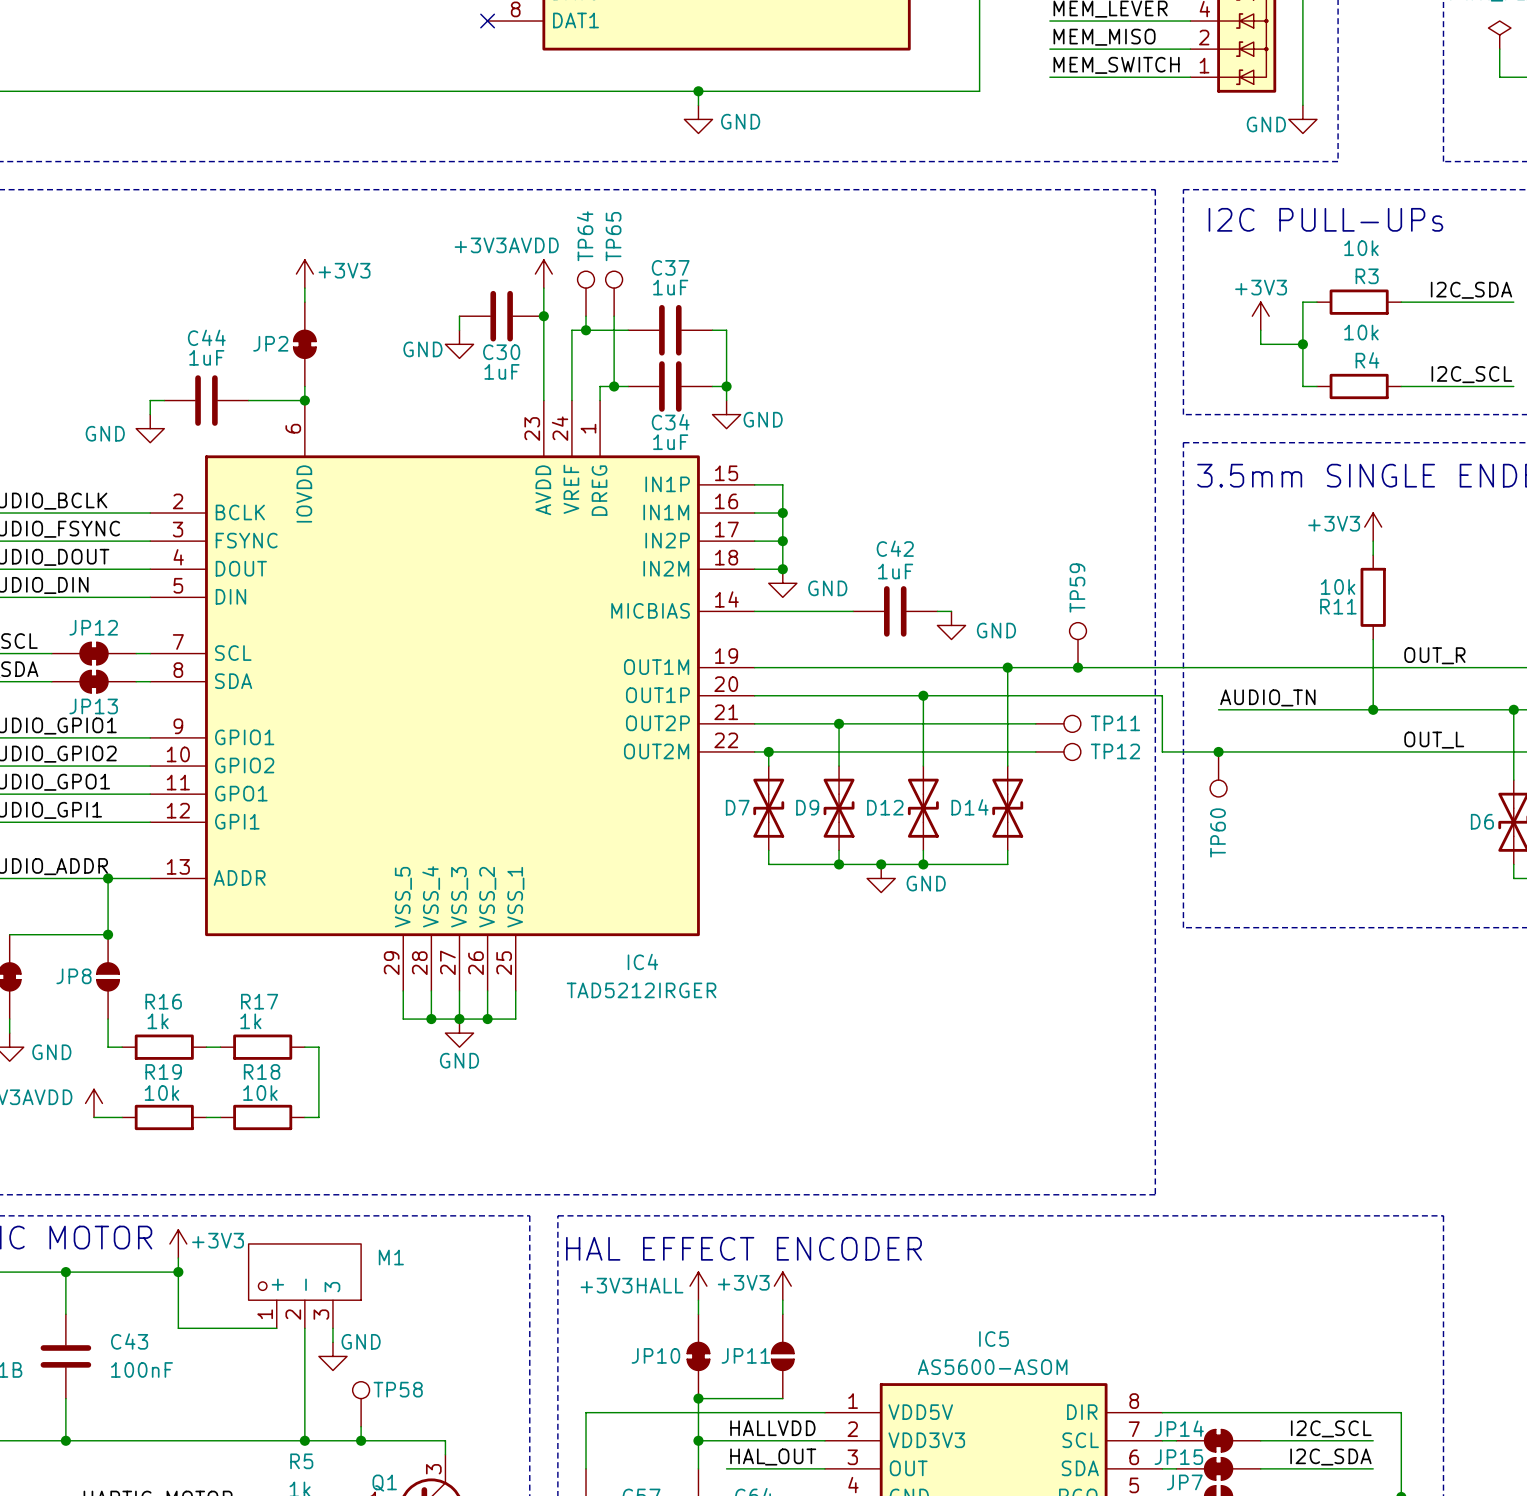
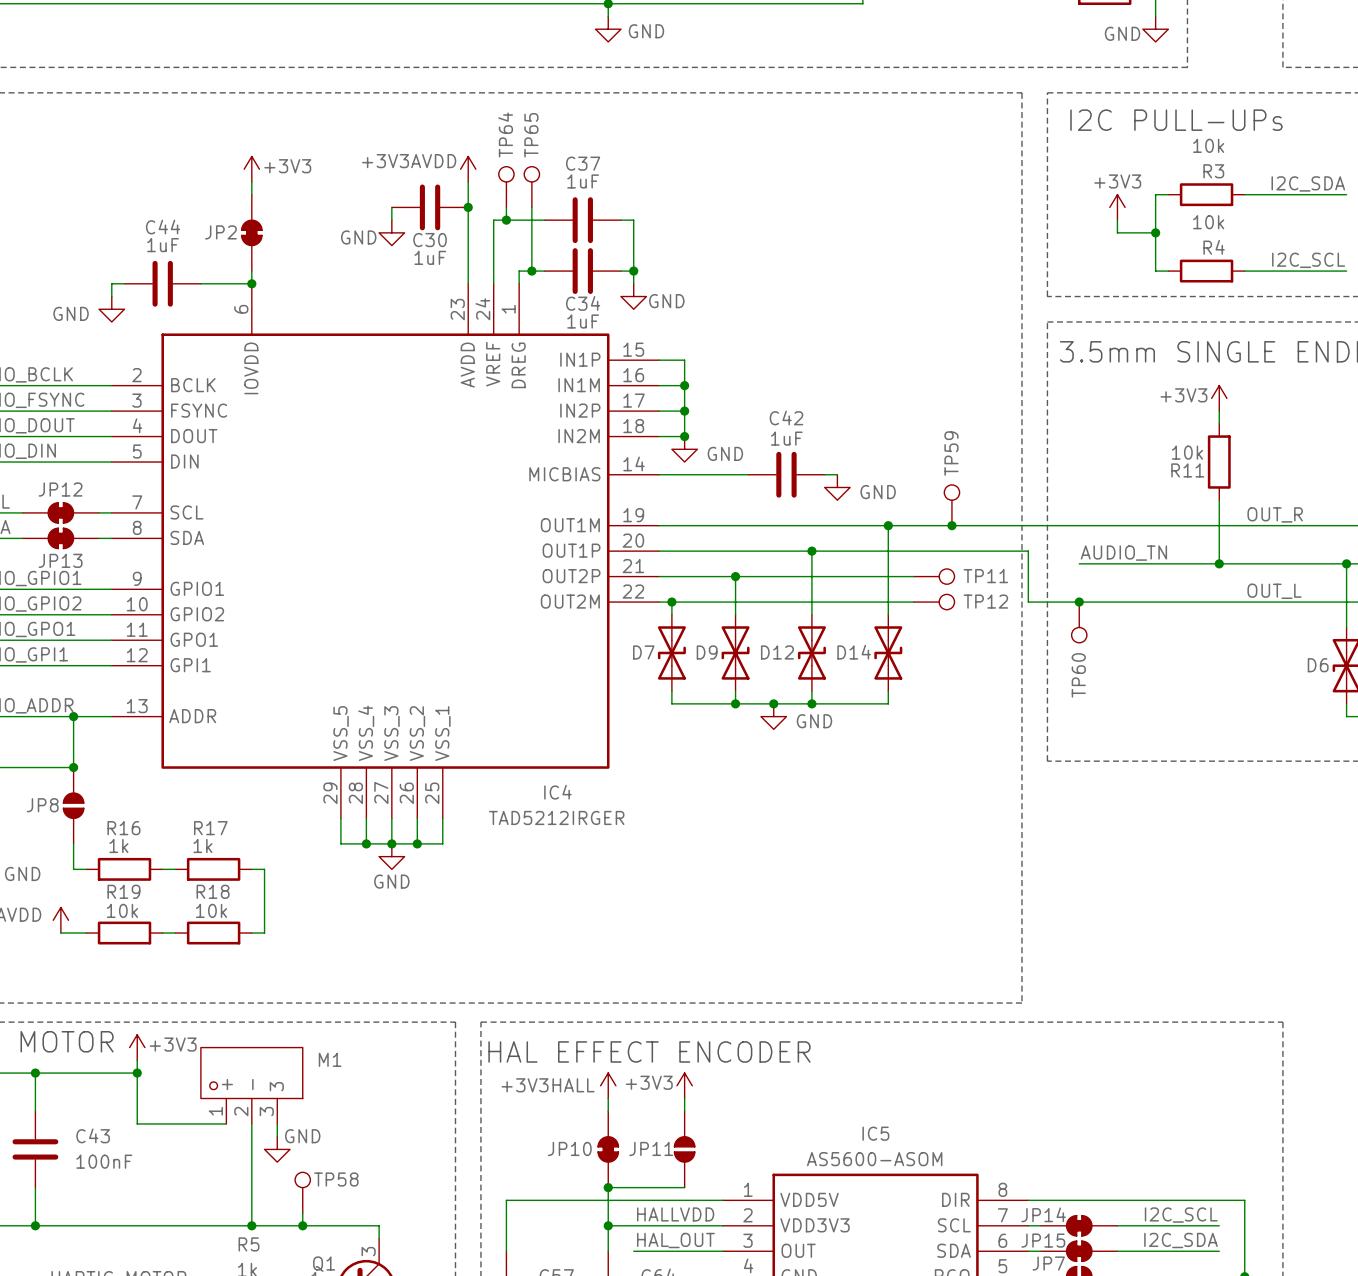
power symbol text position: +3V3AVDD (506, 245) -> +3V3AVDD (409, 161)

